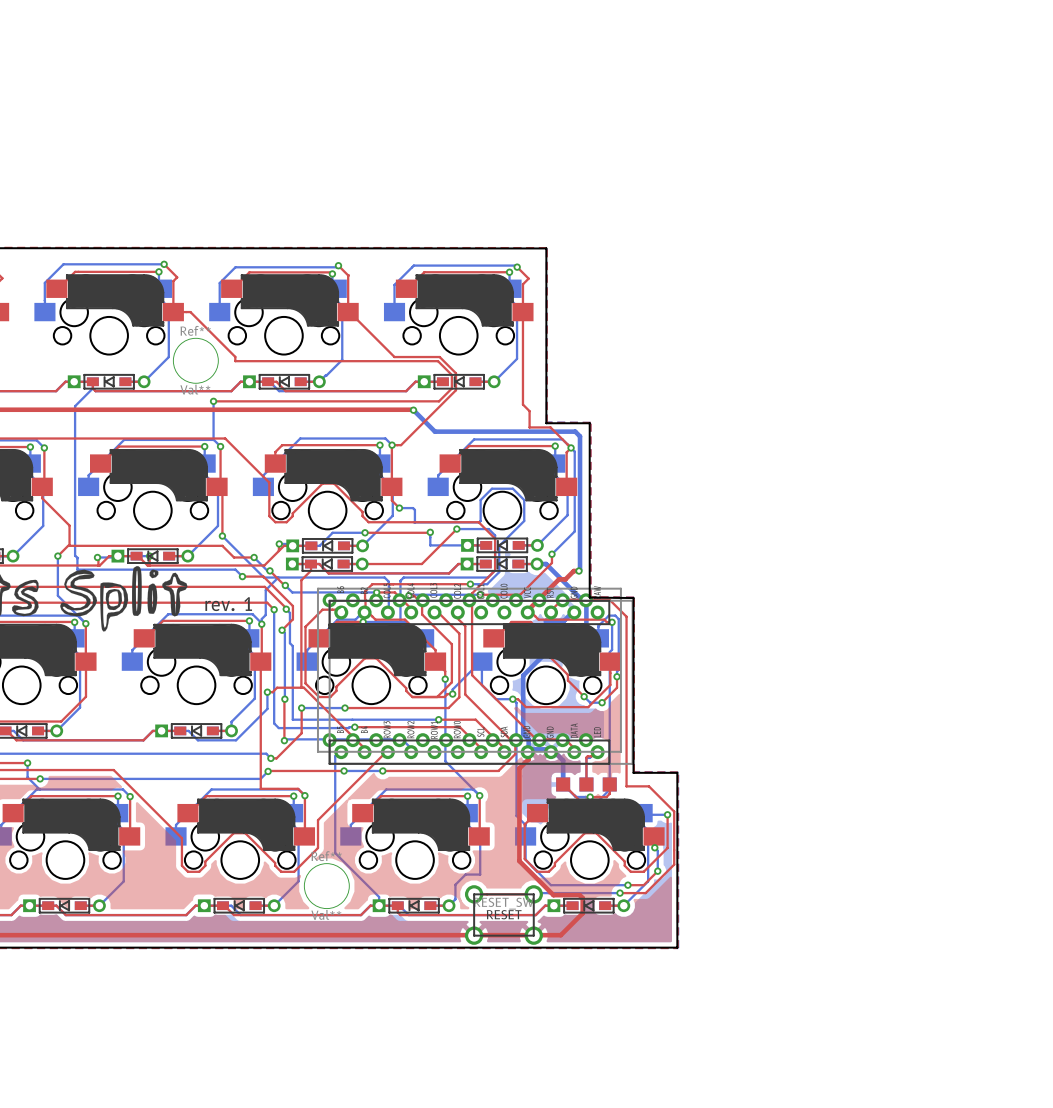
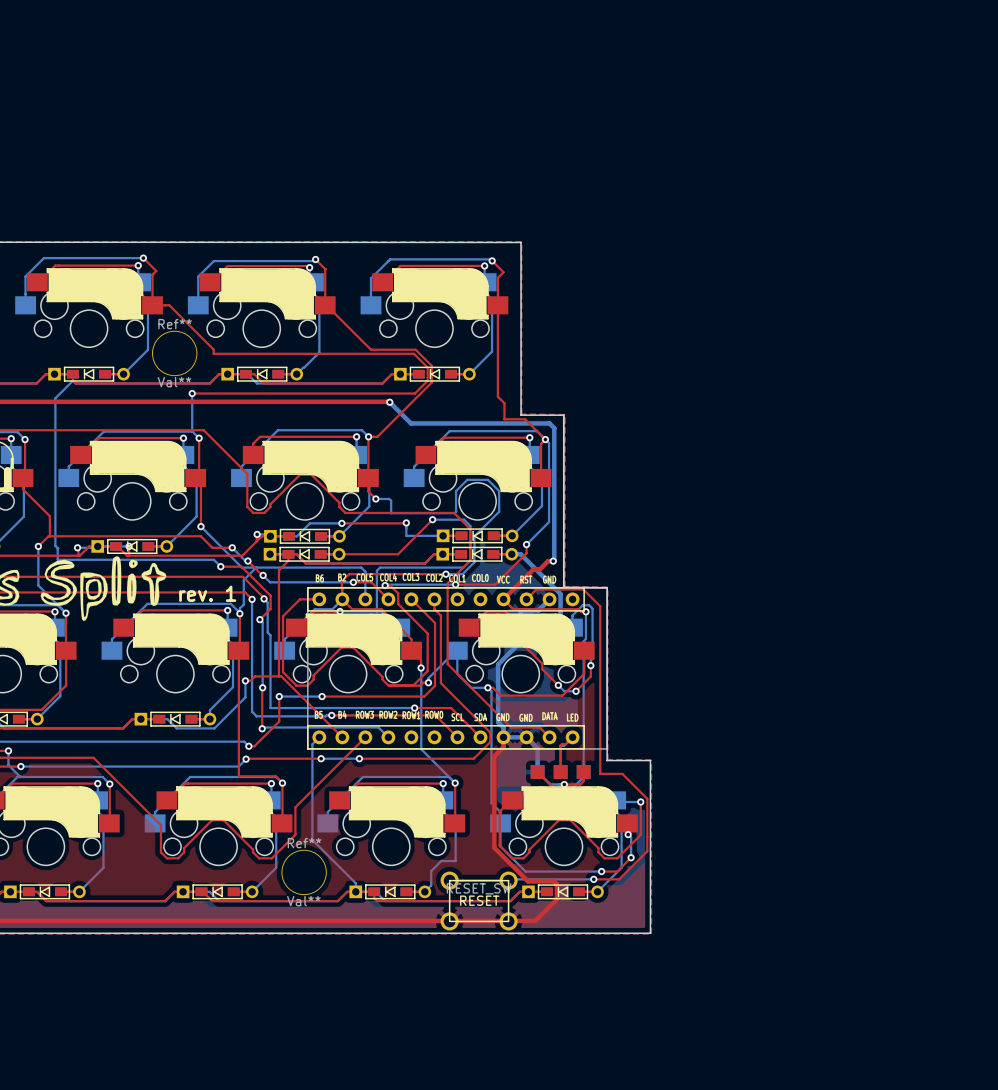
part footprint: [317, 587, 634, 765] -> [307, 587, 608, 750]

